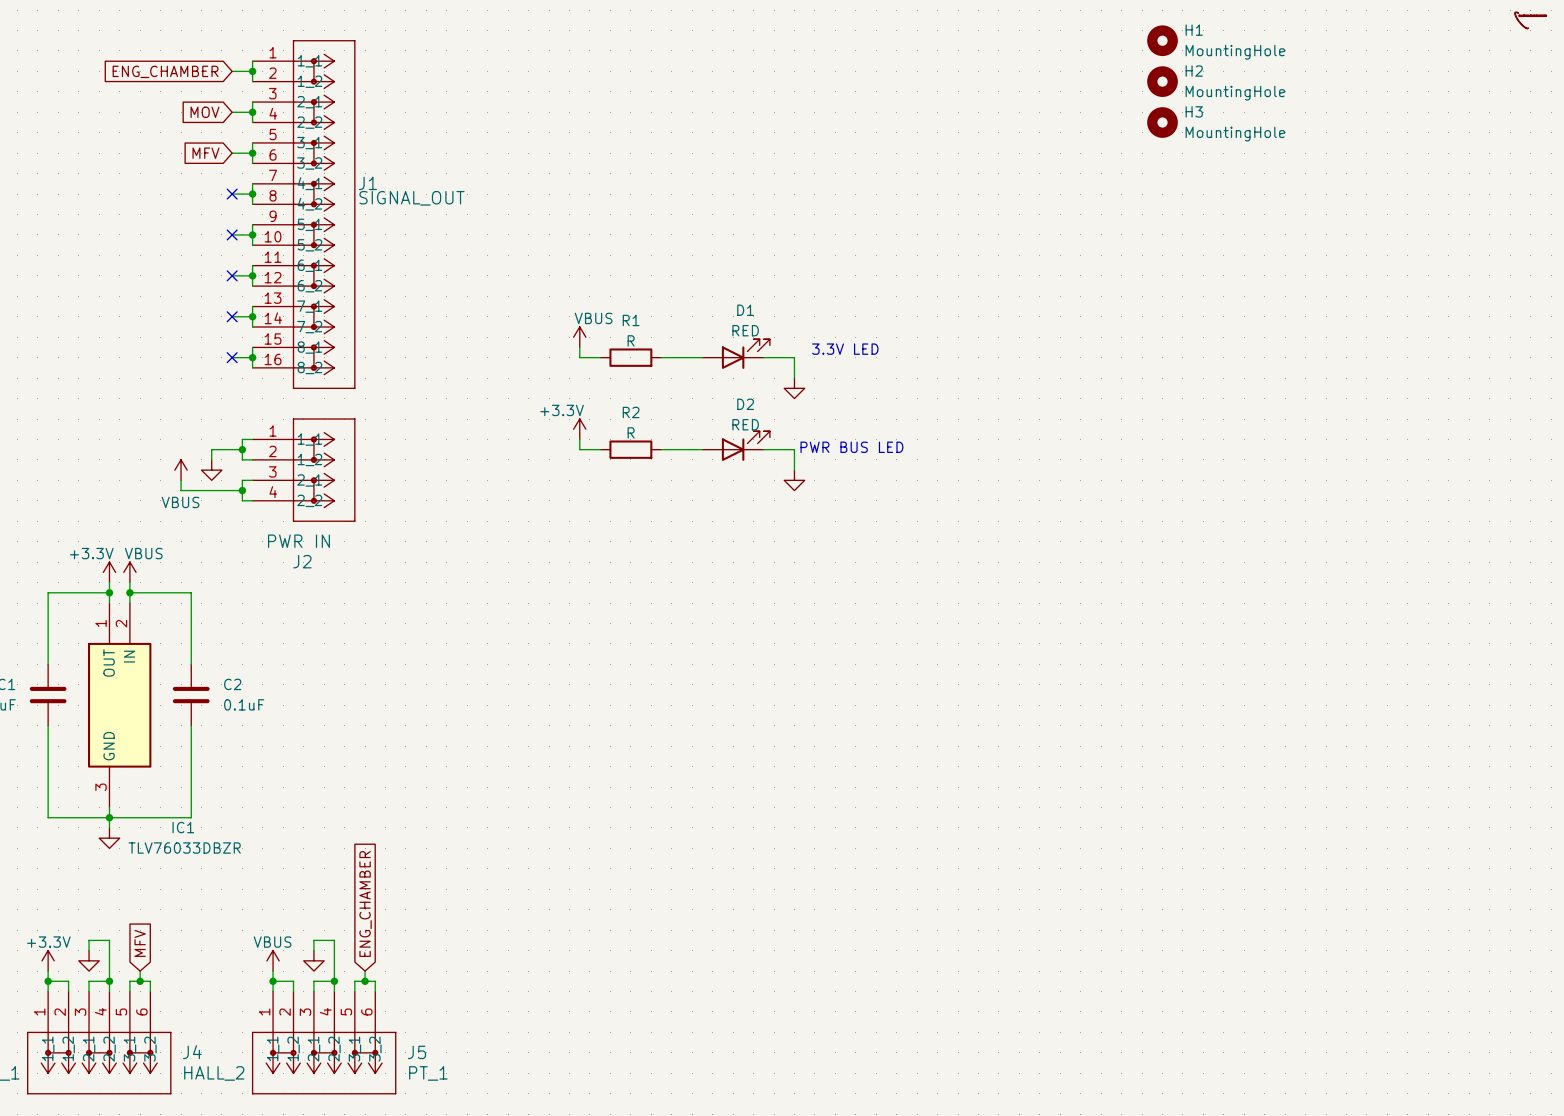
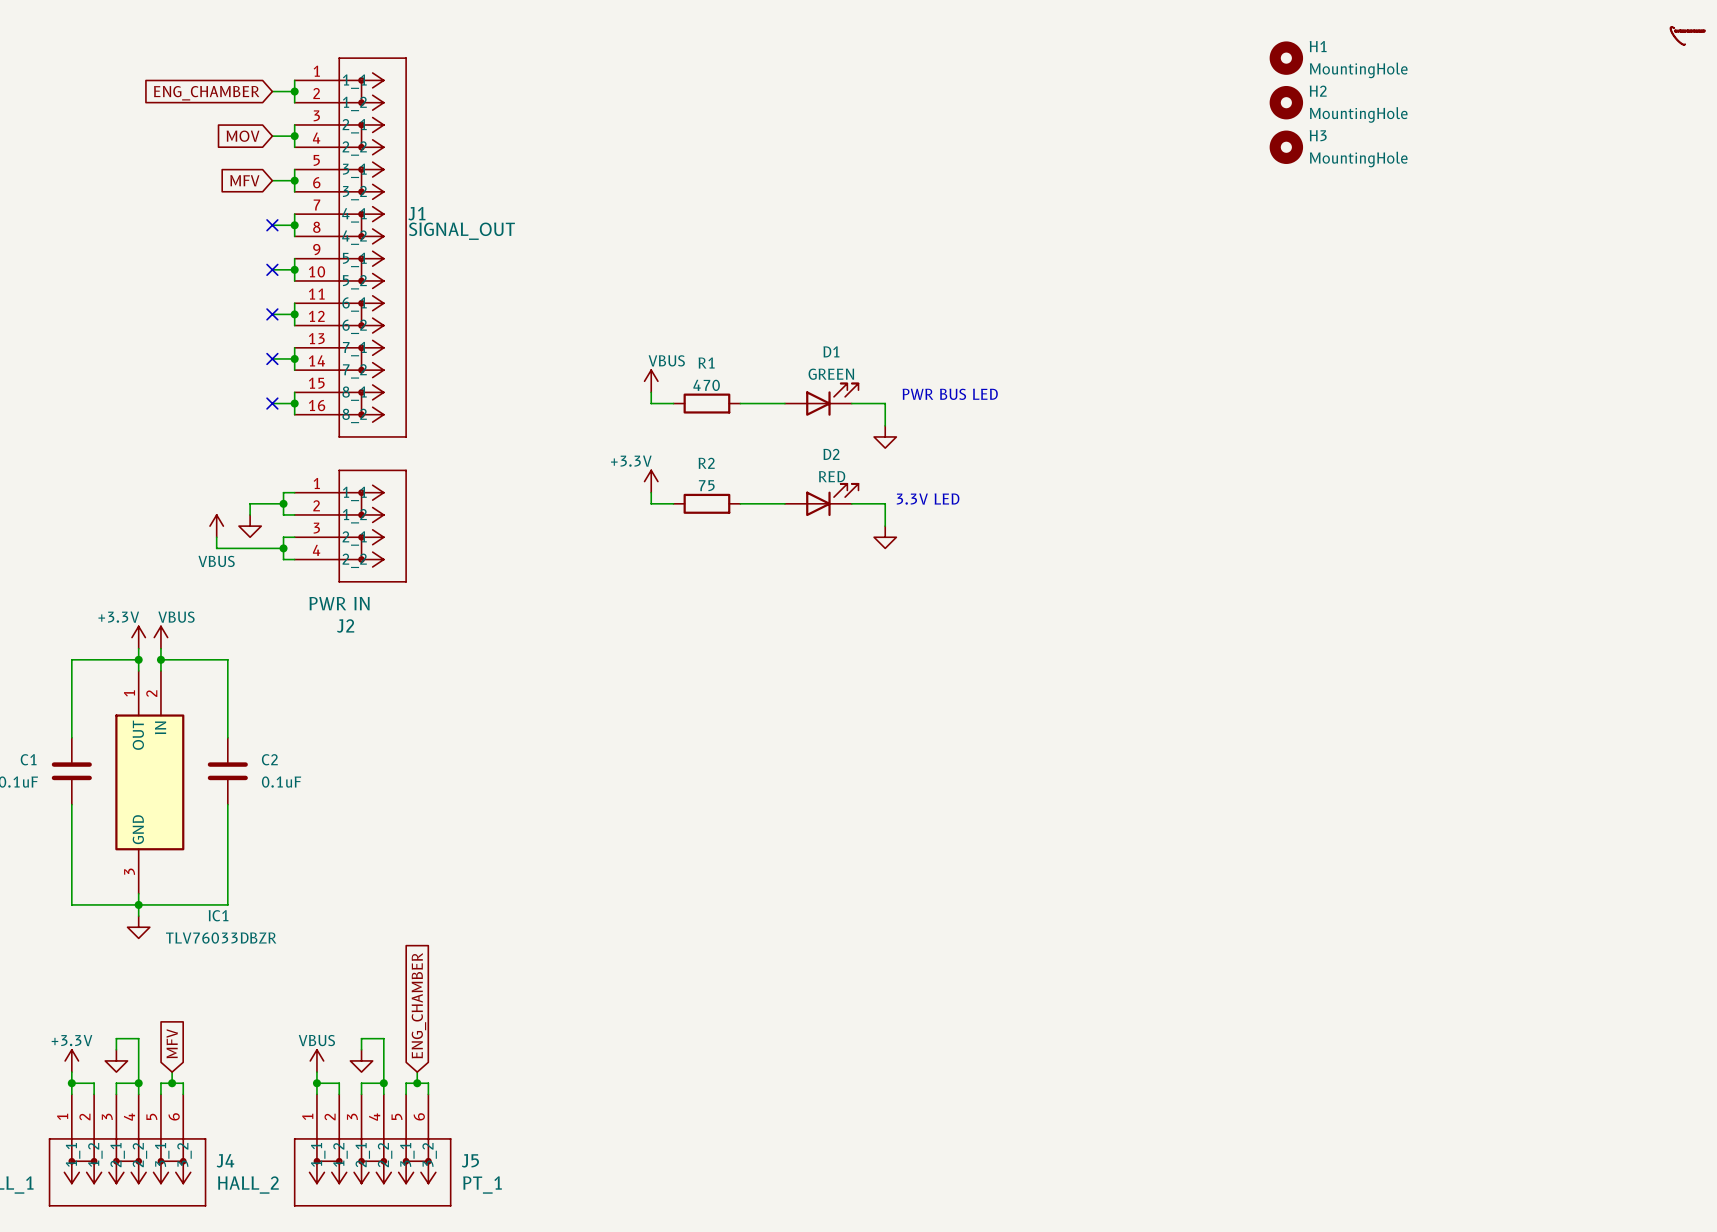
D1 value: RED (745, 330) -> GREEN (831, 374)
R1 value: R (631, 340) -> 470 (706, 385)
text position: 3.3V LED (845, 349) -> 3.3V LED (928, 499)
R2 value: R (631, 432) -> 75 (706, 485)
text position: PWR BUS LED (851, 447) -> PWR BUS LED (950, 394)

